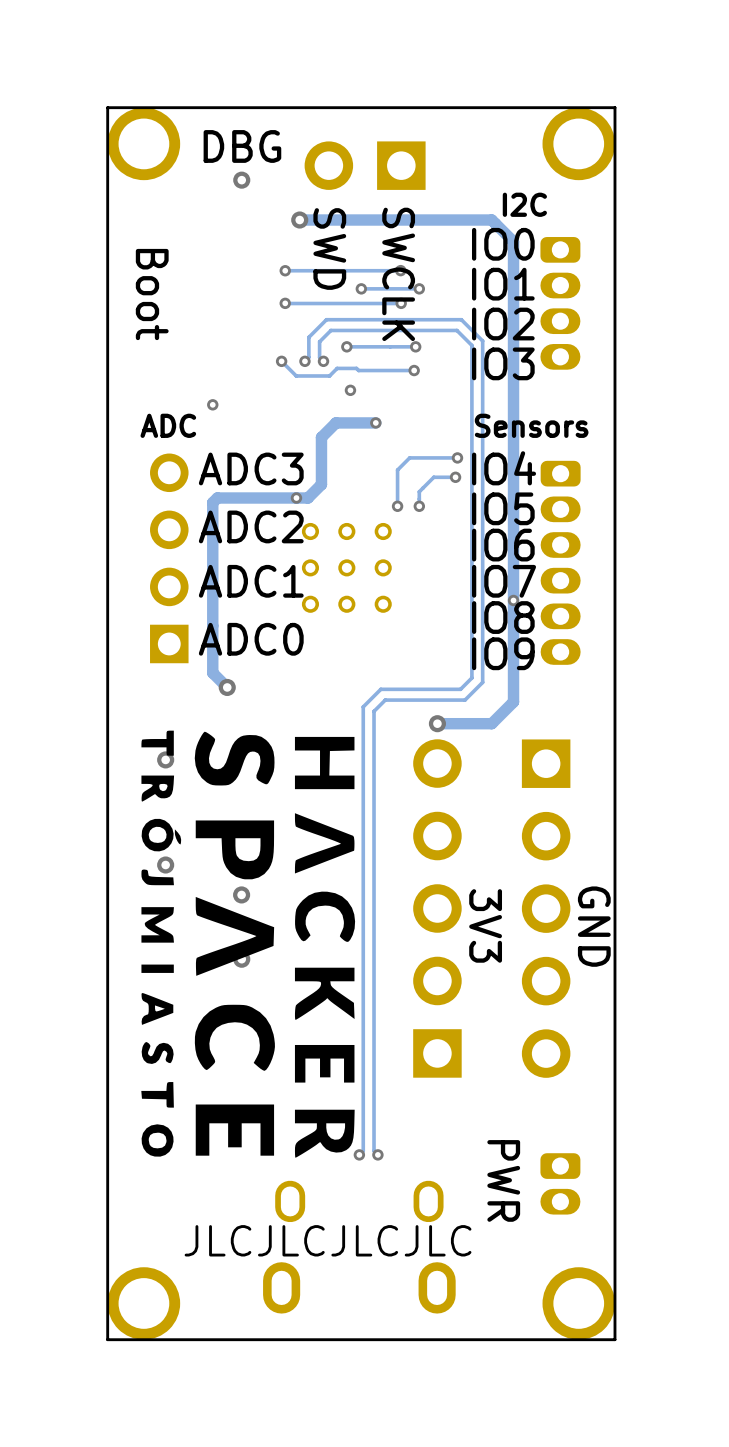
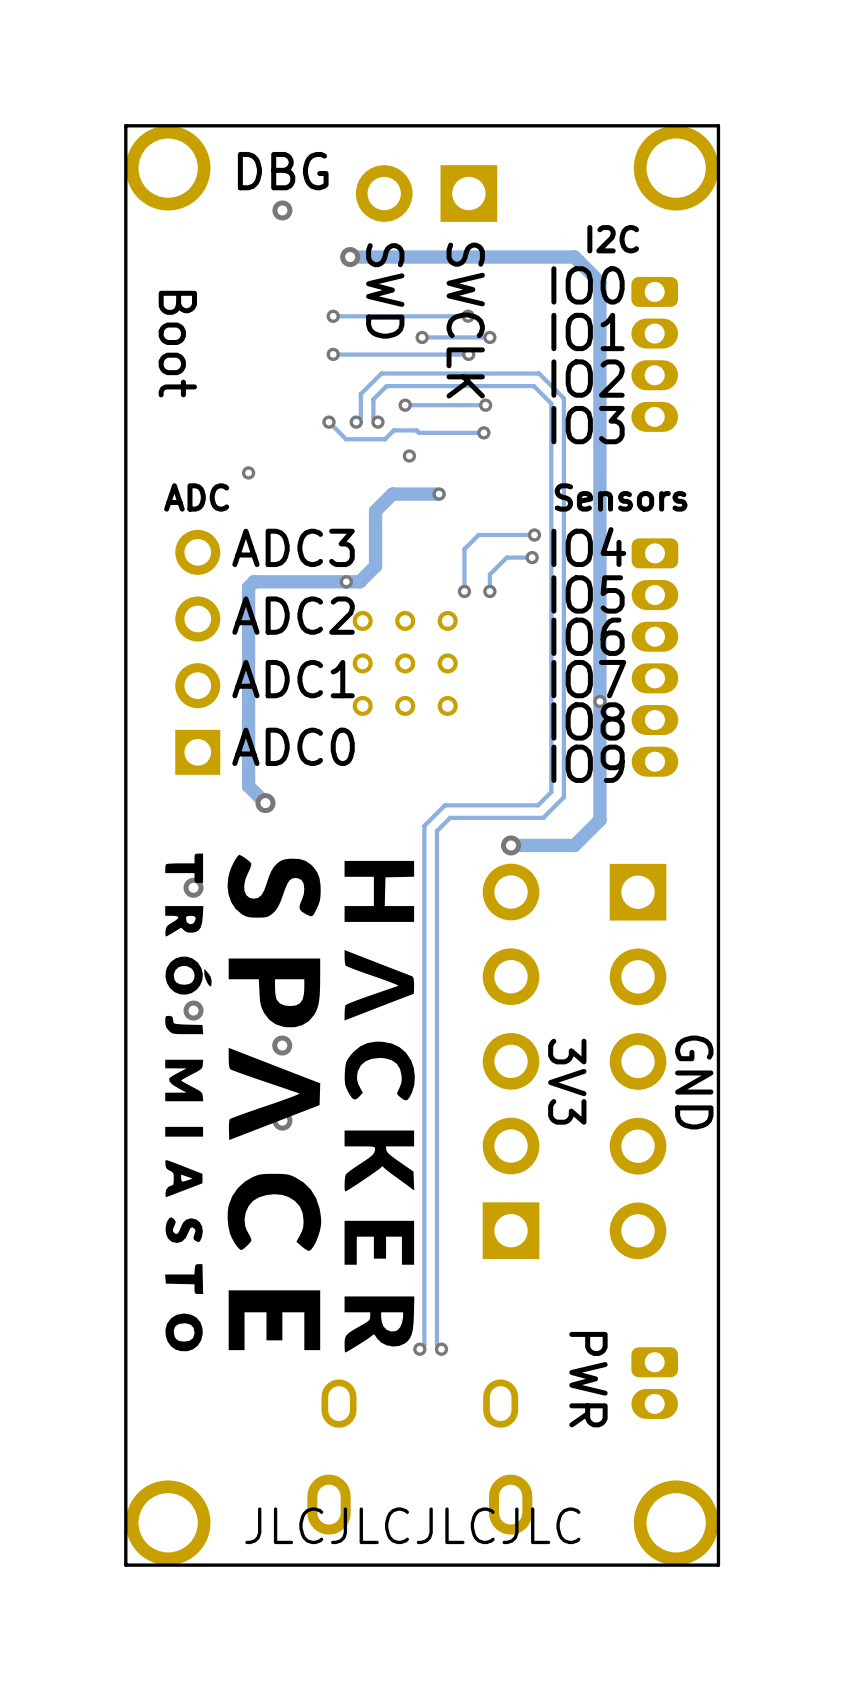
text position: JLCJLCJLCJLC (328, 1240) -> JLCJLCJLCJLC (412, 1525)

